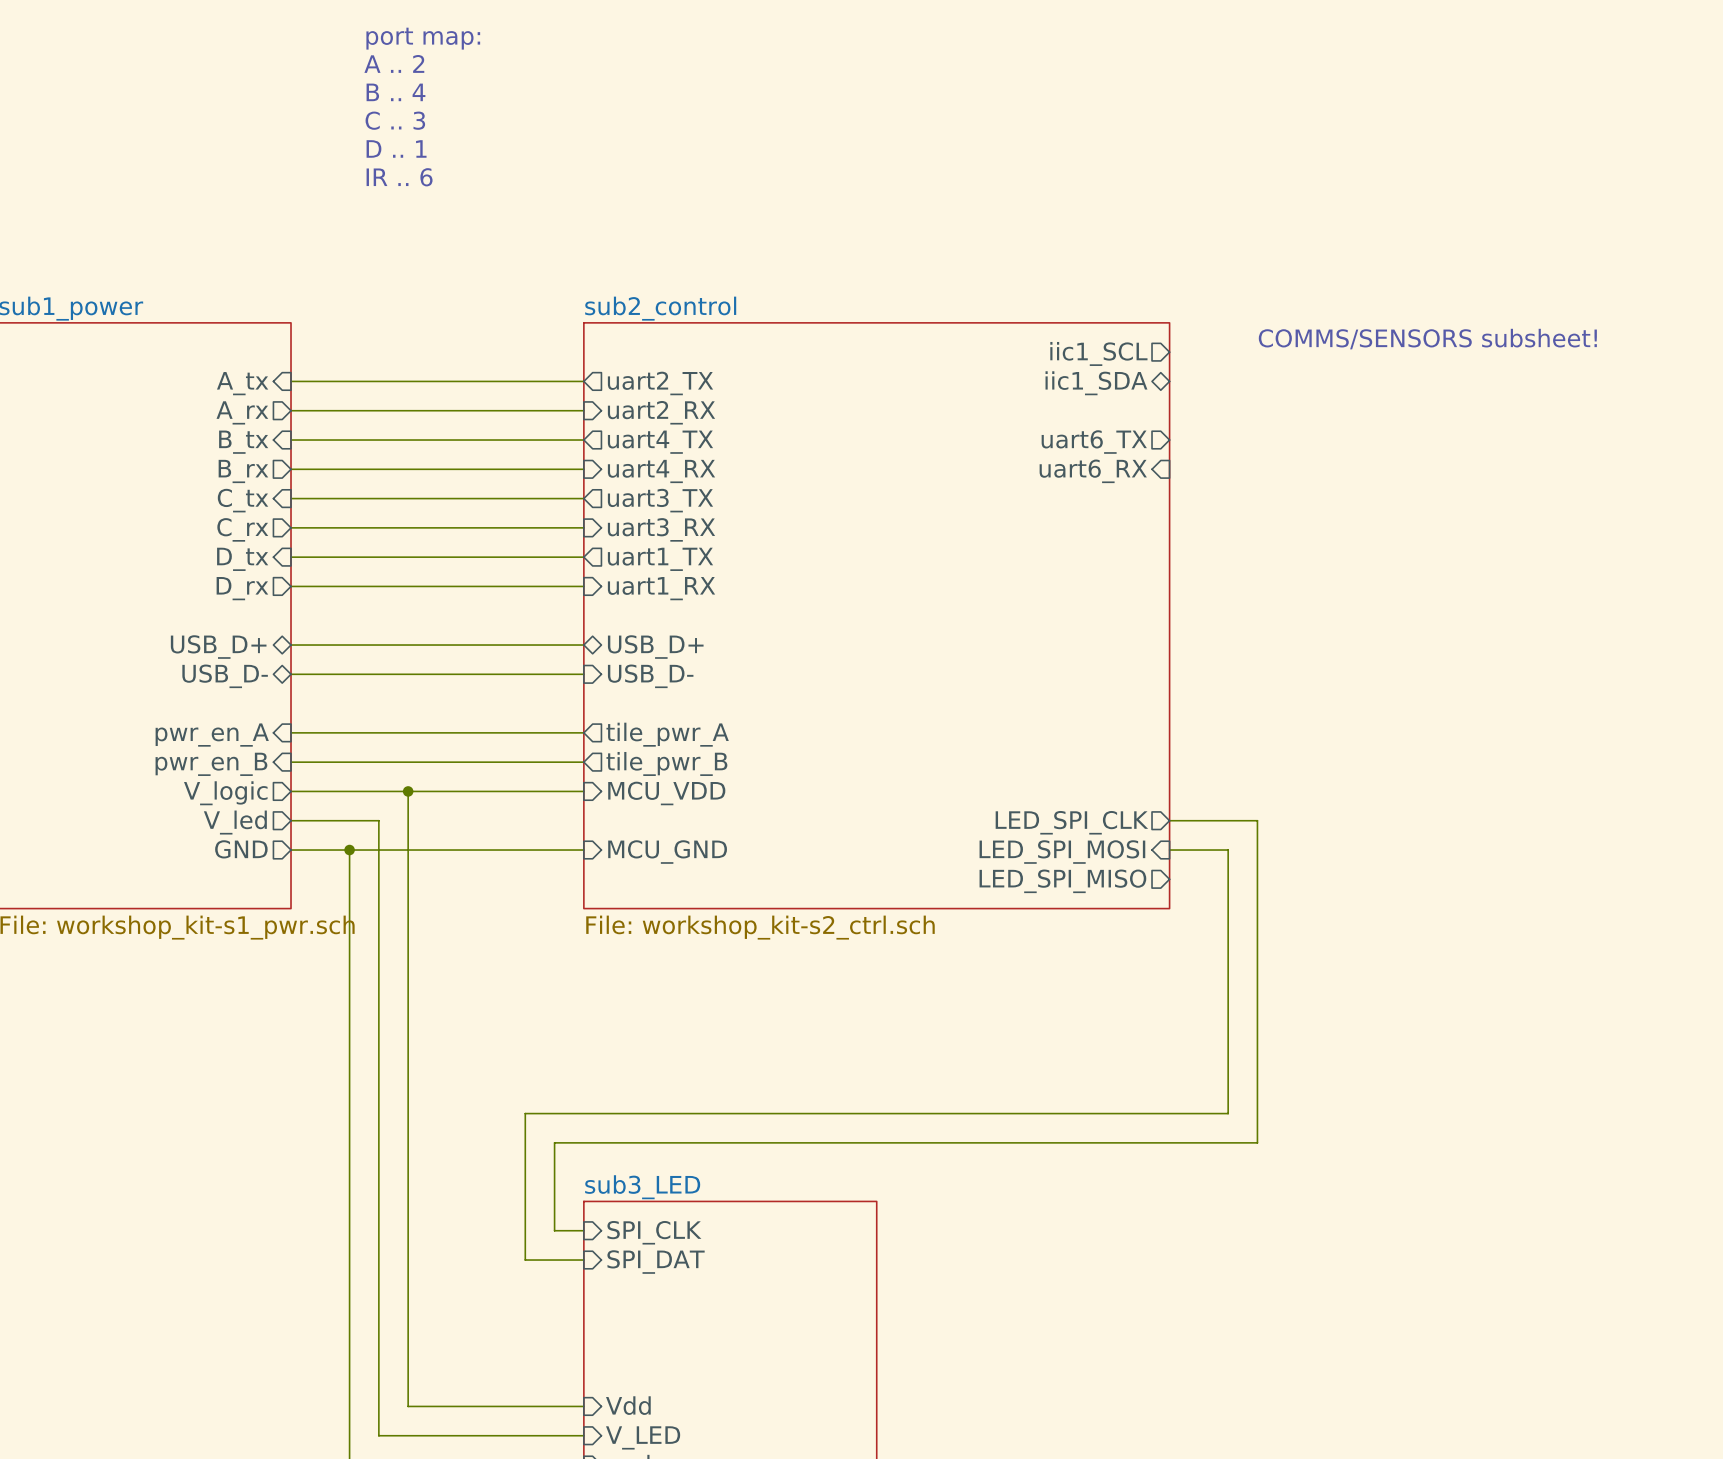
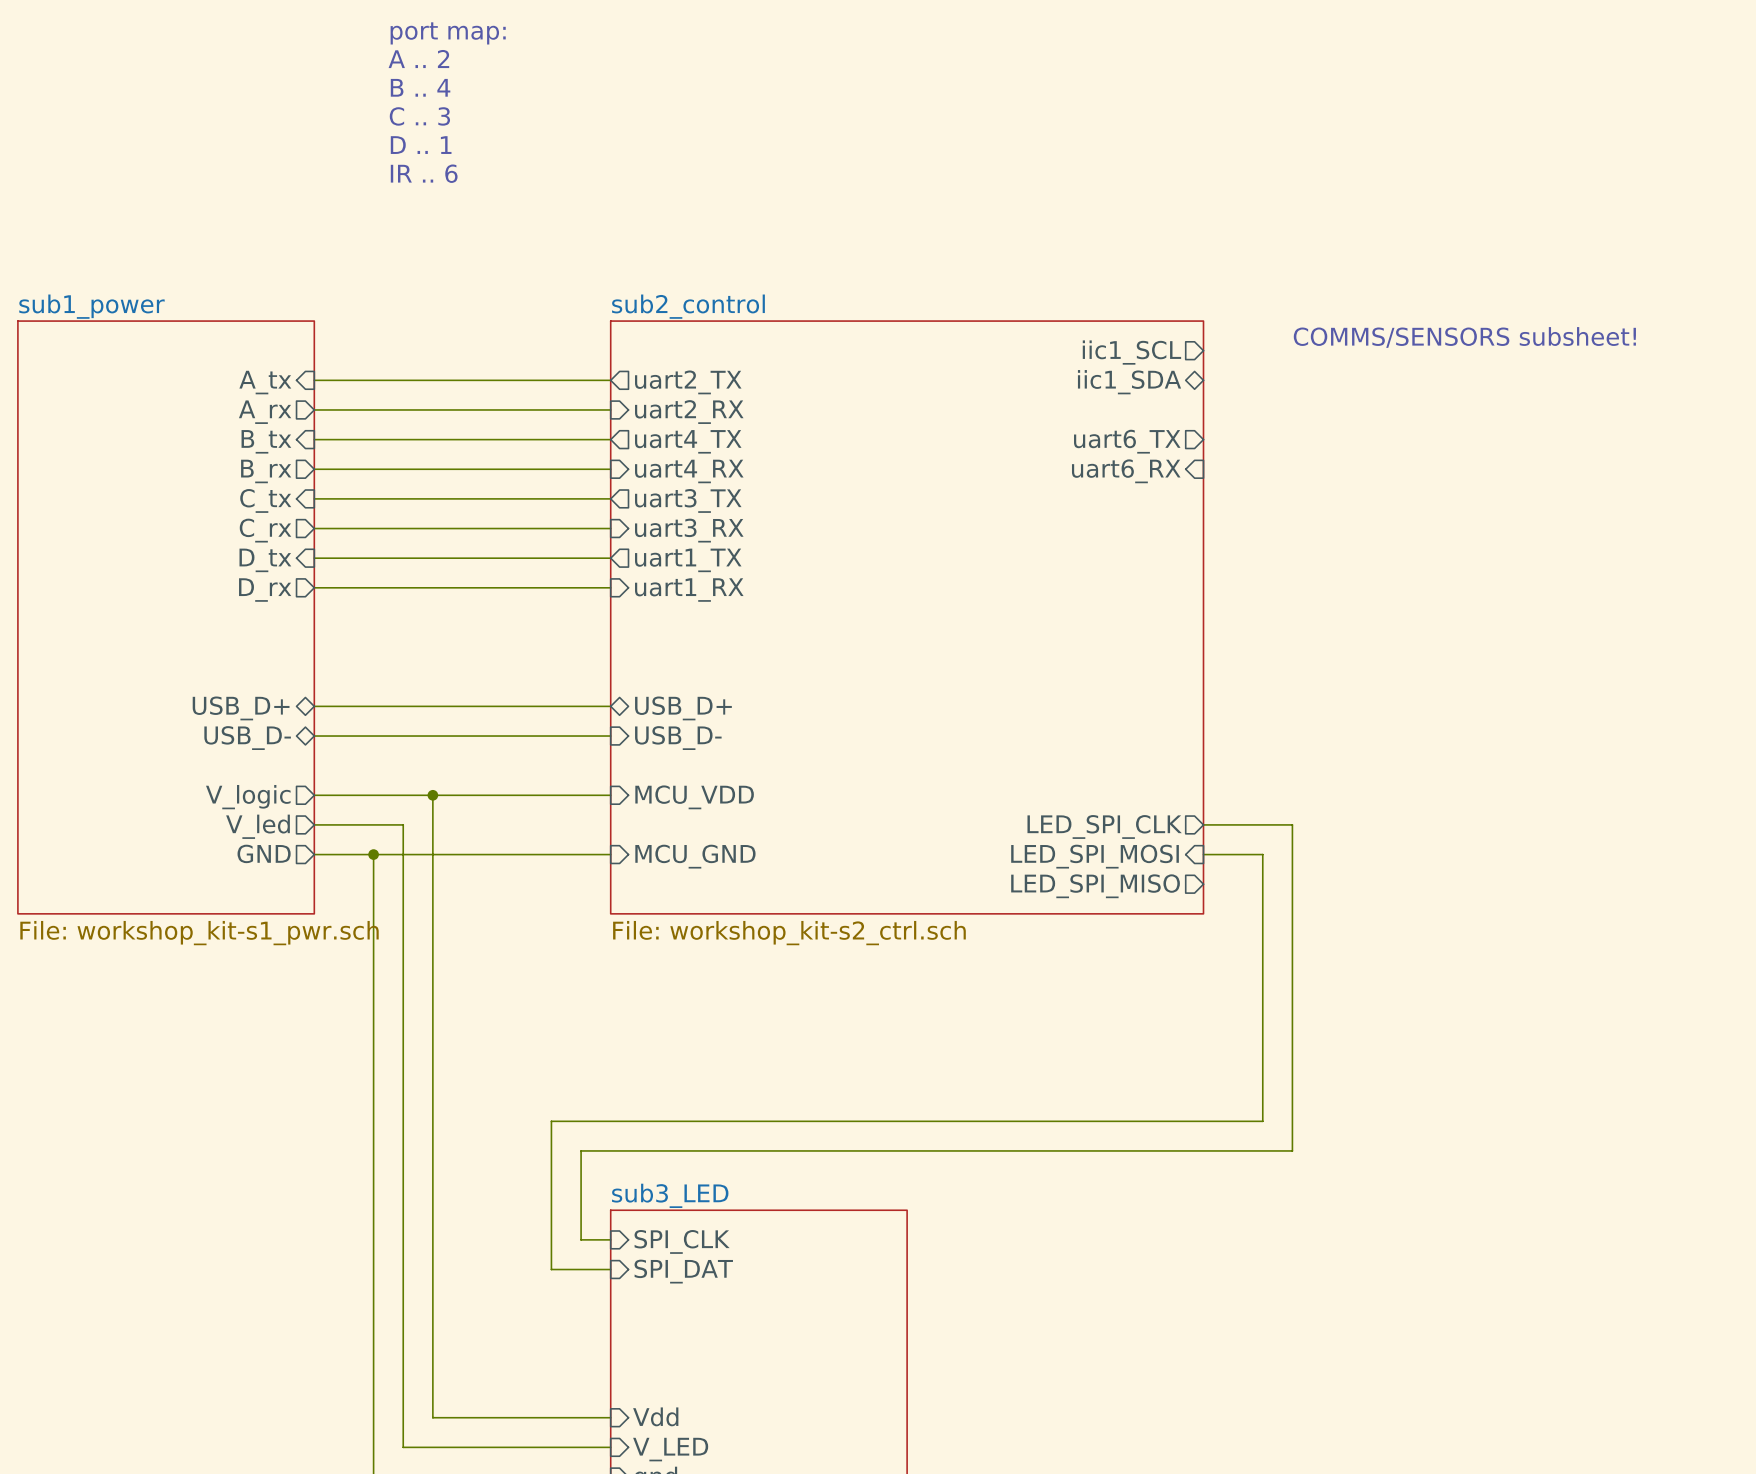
wire: (291, 645) (583, 645) -> none
sheet pin position: USB_D+ (218, 647) -> USB_D+ (241, 708)
sheet pin position: USB_D+ (655, 647) -> USB_D+ (683, 708)
wire: (291, 674) (583, 674) -> (314, 706) (610, 706)
sheet pin: USB_D- (225, 676) -> none
sheet pin: USB_D- (650, 676) -> none
sheet pin shape: output (667, 734) -> input (678, 738)
sheet pin: tile_pwr_A (667, 734) -> USB_D- (678, 738)
sheet pin shape: input (212, 735) -> bidirectional (247, 738)
sheet pin: pwr_en_A (212, 735) -> USB_D- (247, 738)
wire: (291, 762) (583, 762) -> none
sheet pin: tile_pwr_B (666, 763) -> none
sheet pin: pwr_en_B (211, 764) -> none

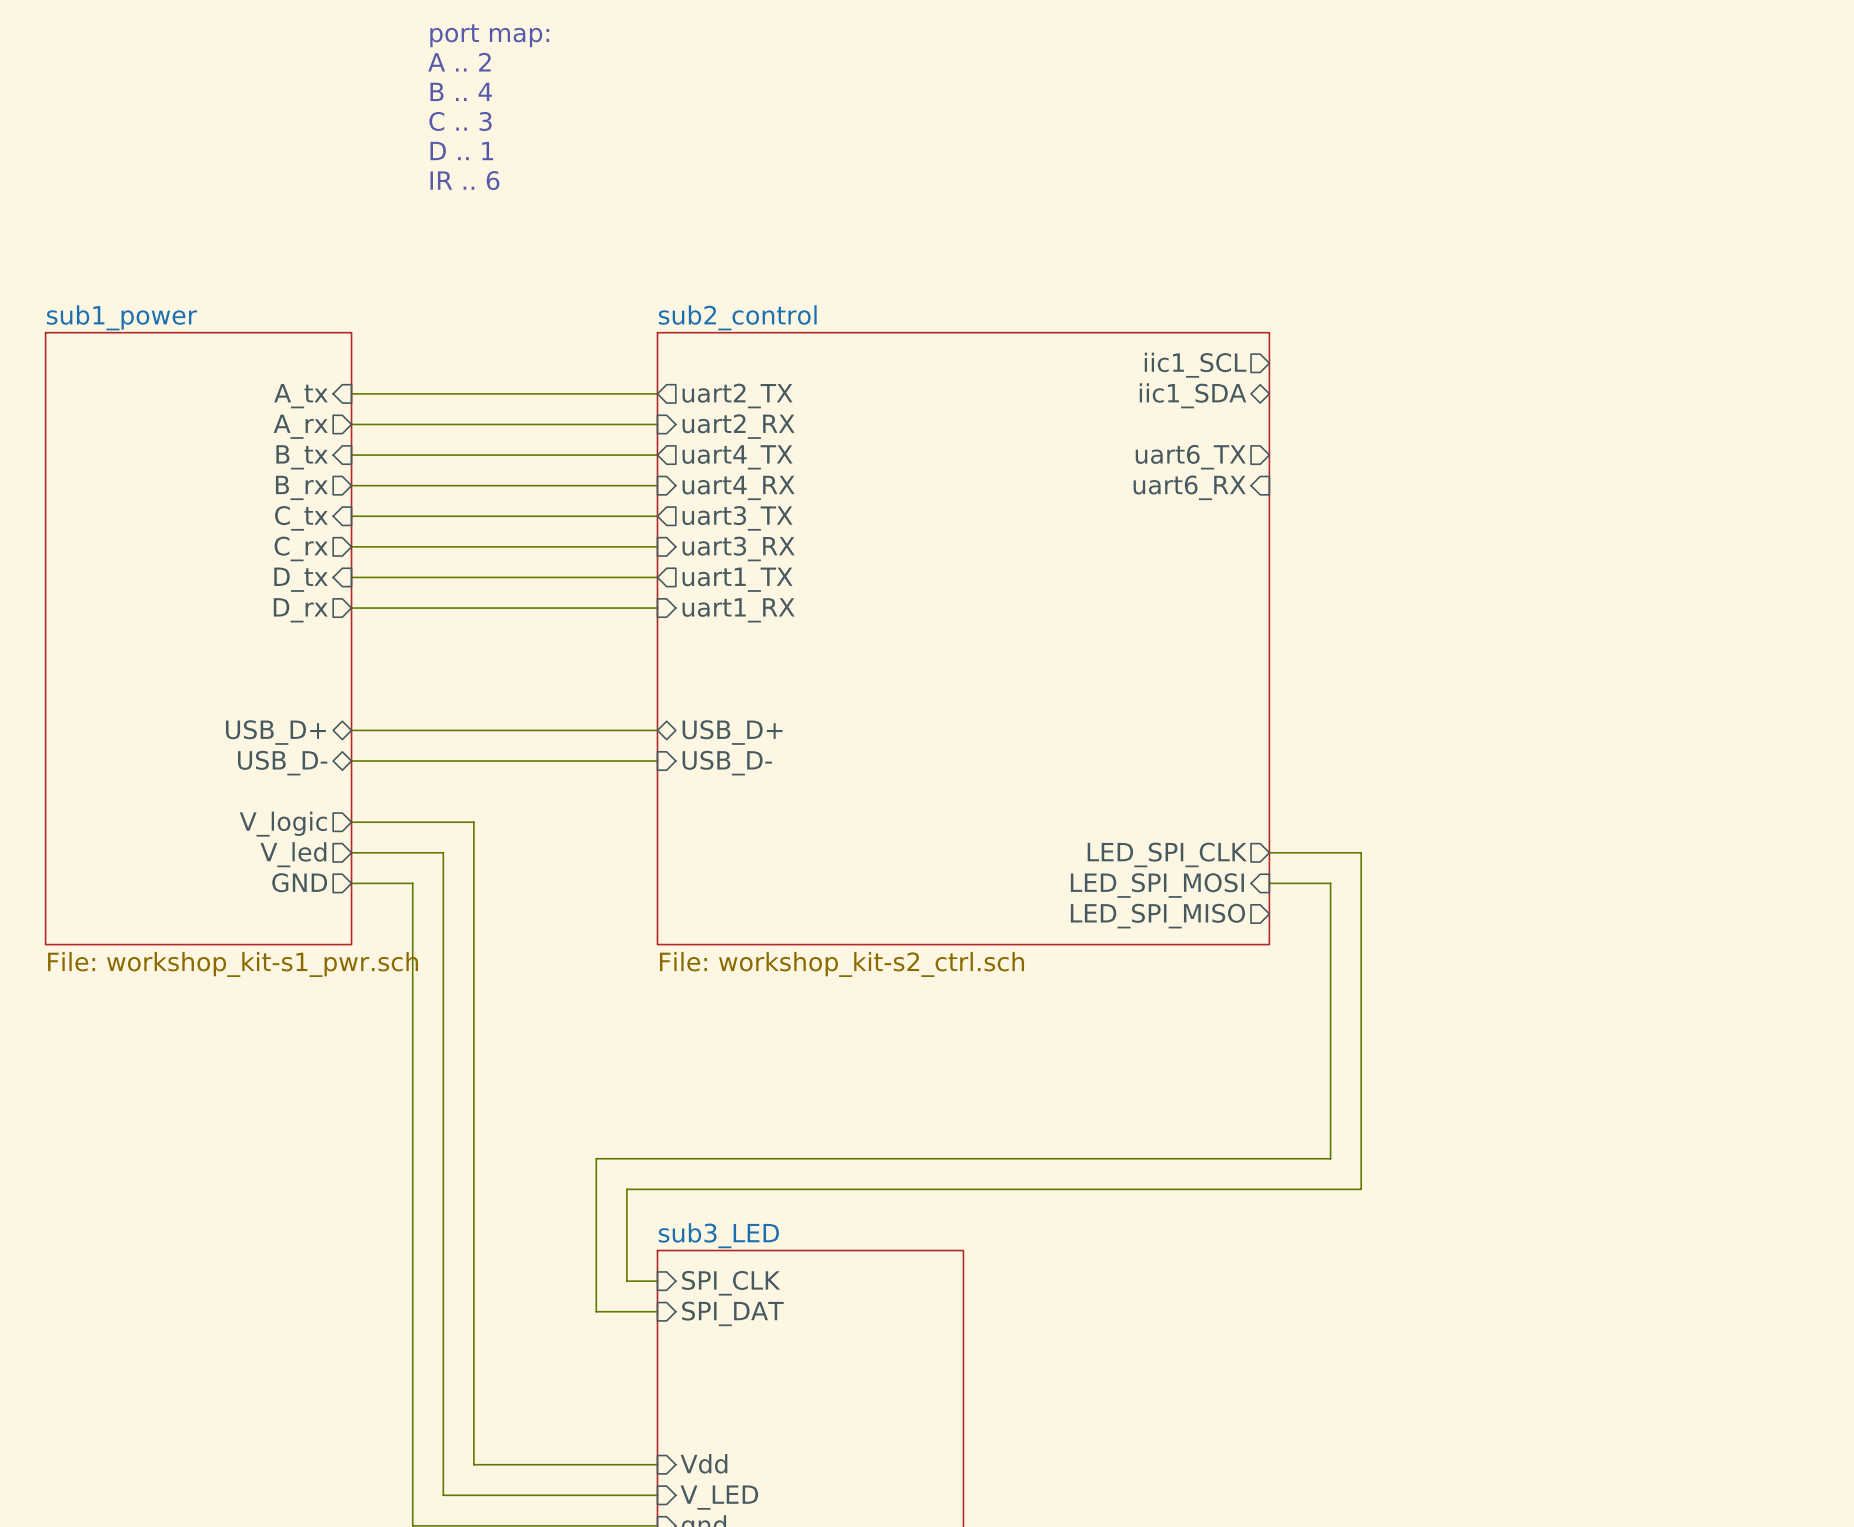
text: COMMS/SENSORS subsheet! (1464, 337) -> none
wire: (432, 795) (610, 795) -> none
junction: (432, 795) -> none
sheet pin: MCU_VDD (694, 797) -> none
wire: (373, 854) (610, 854) -> none
junction: (373, 854) -> none
sheet pin: MCU_GND (695, 856) -> none

